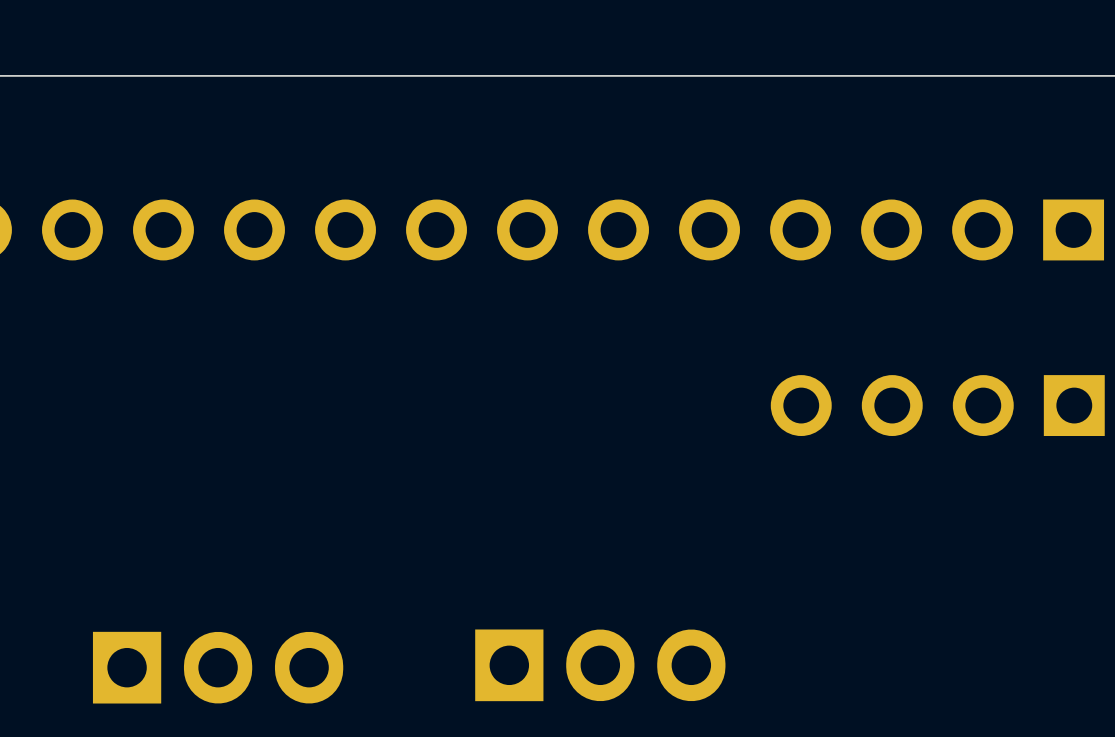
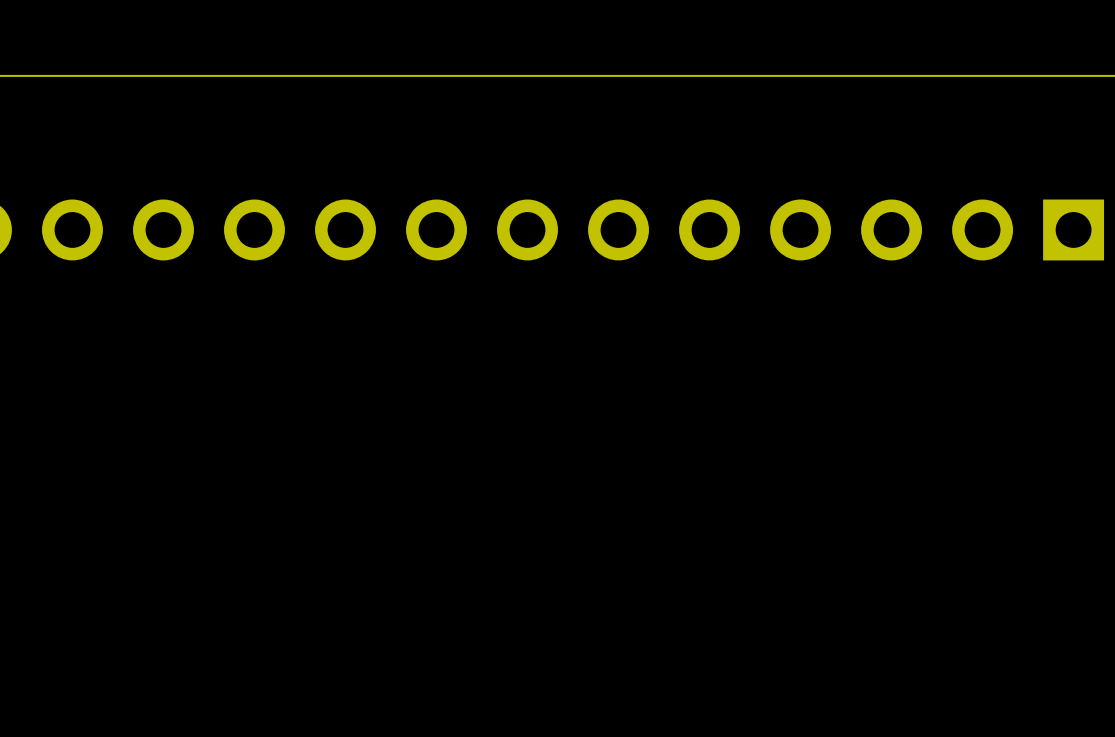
part: (937, 405) -> none
part: (600, 665) -> none
part: (218, 667) -> none

